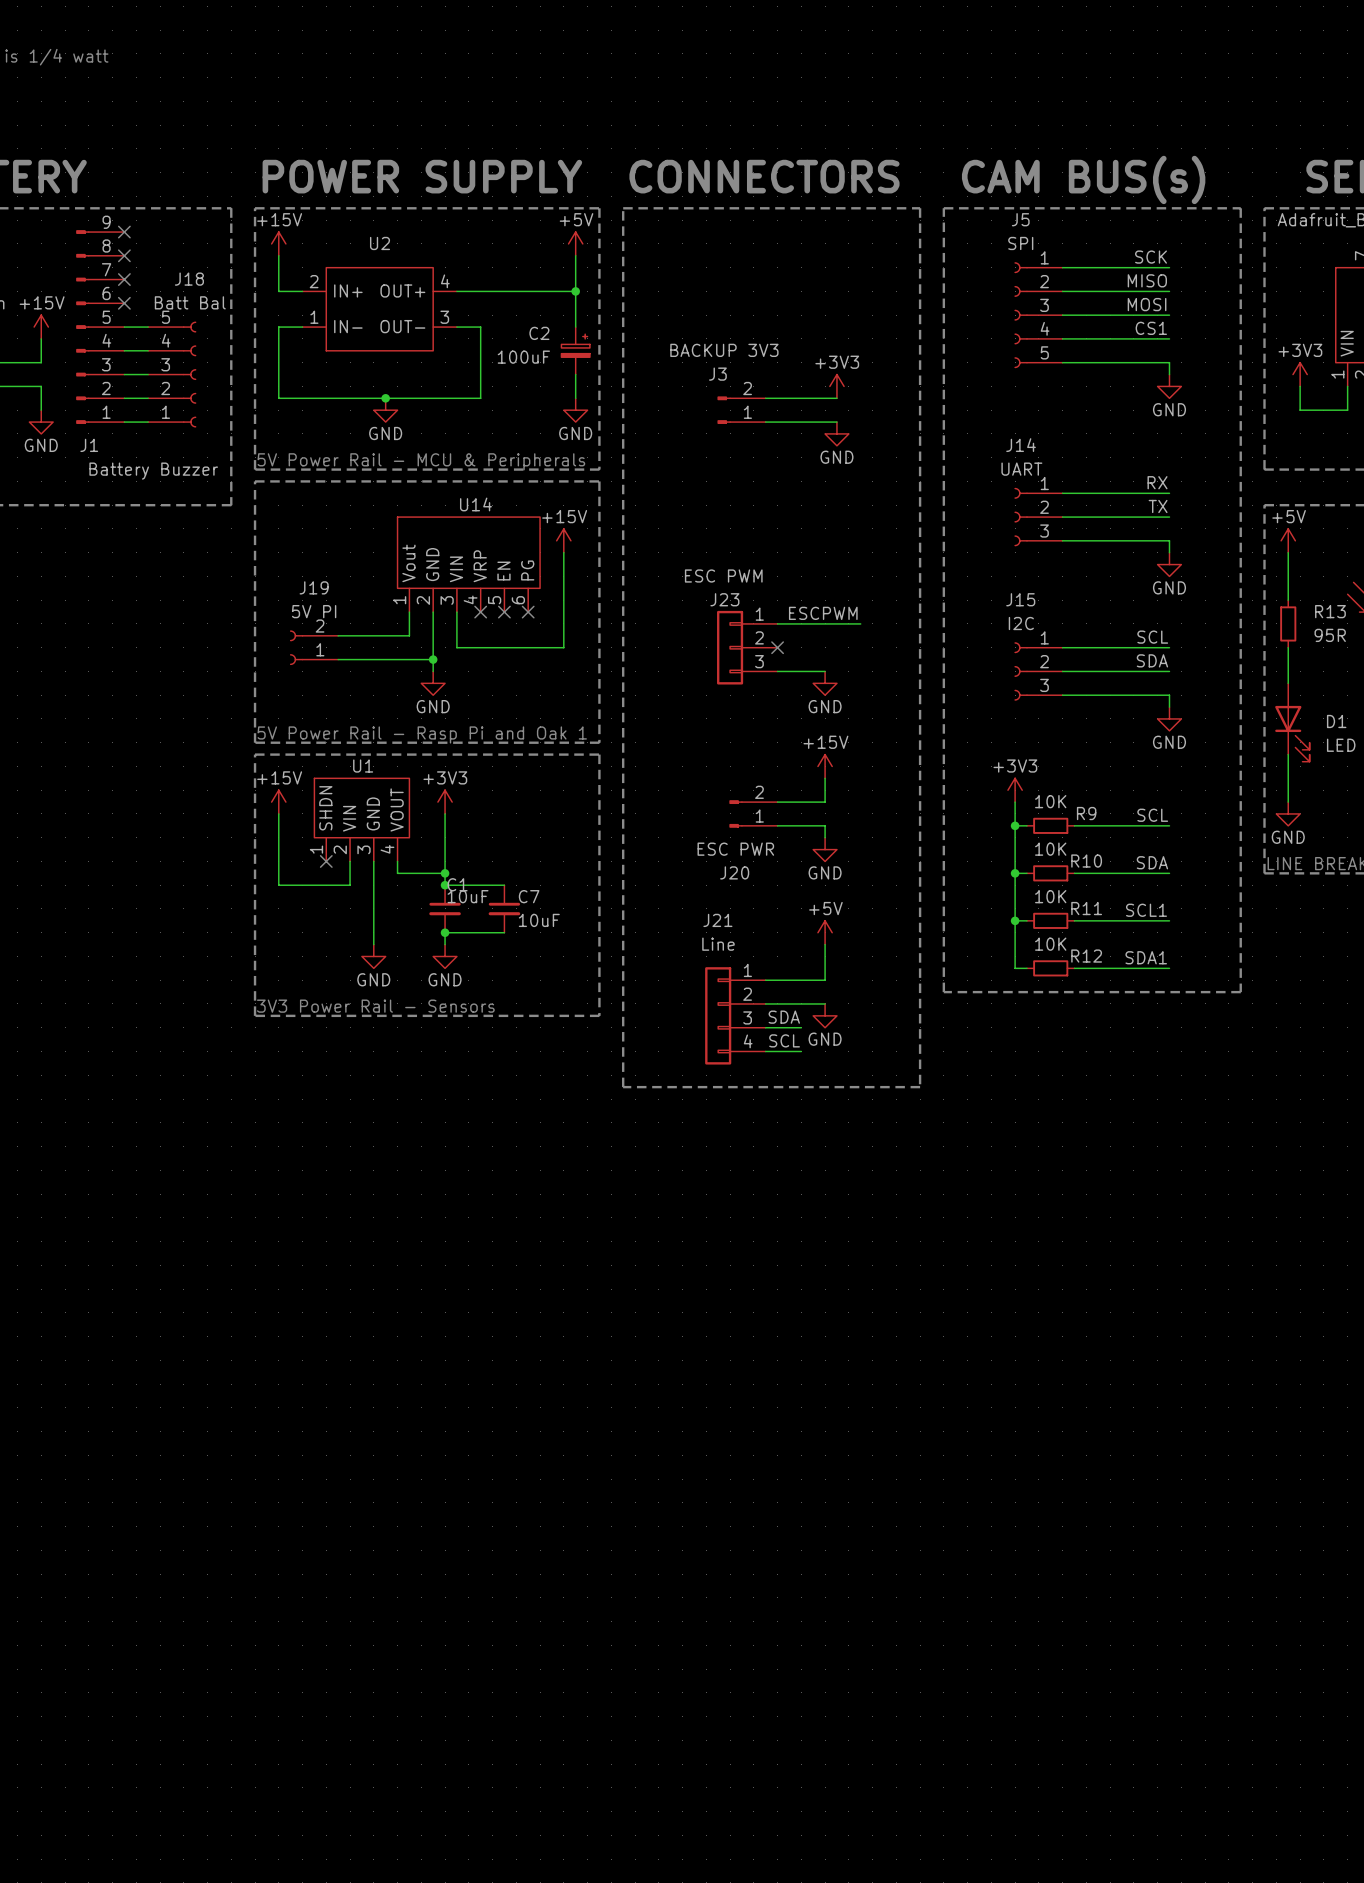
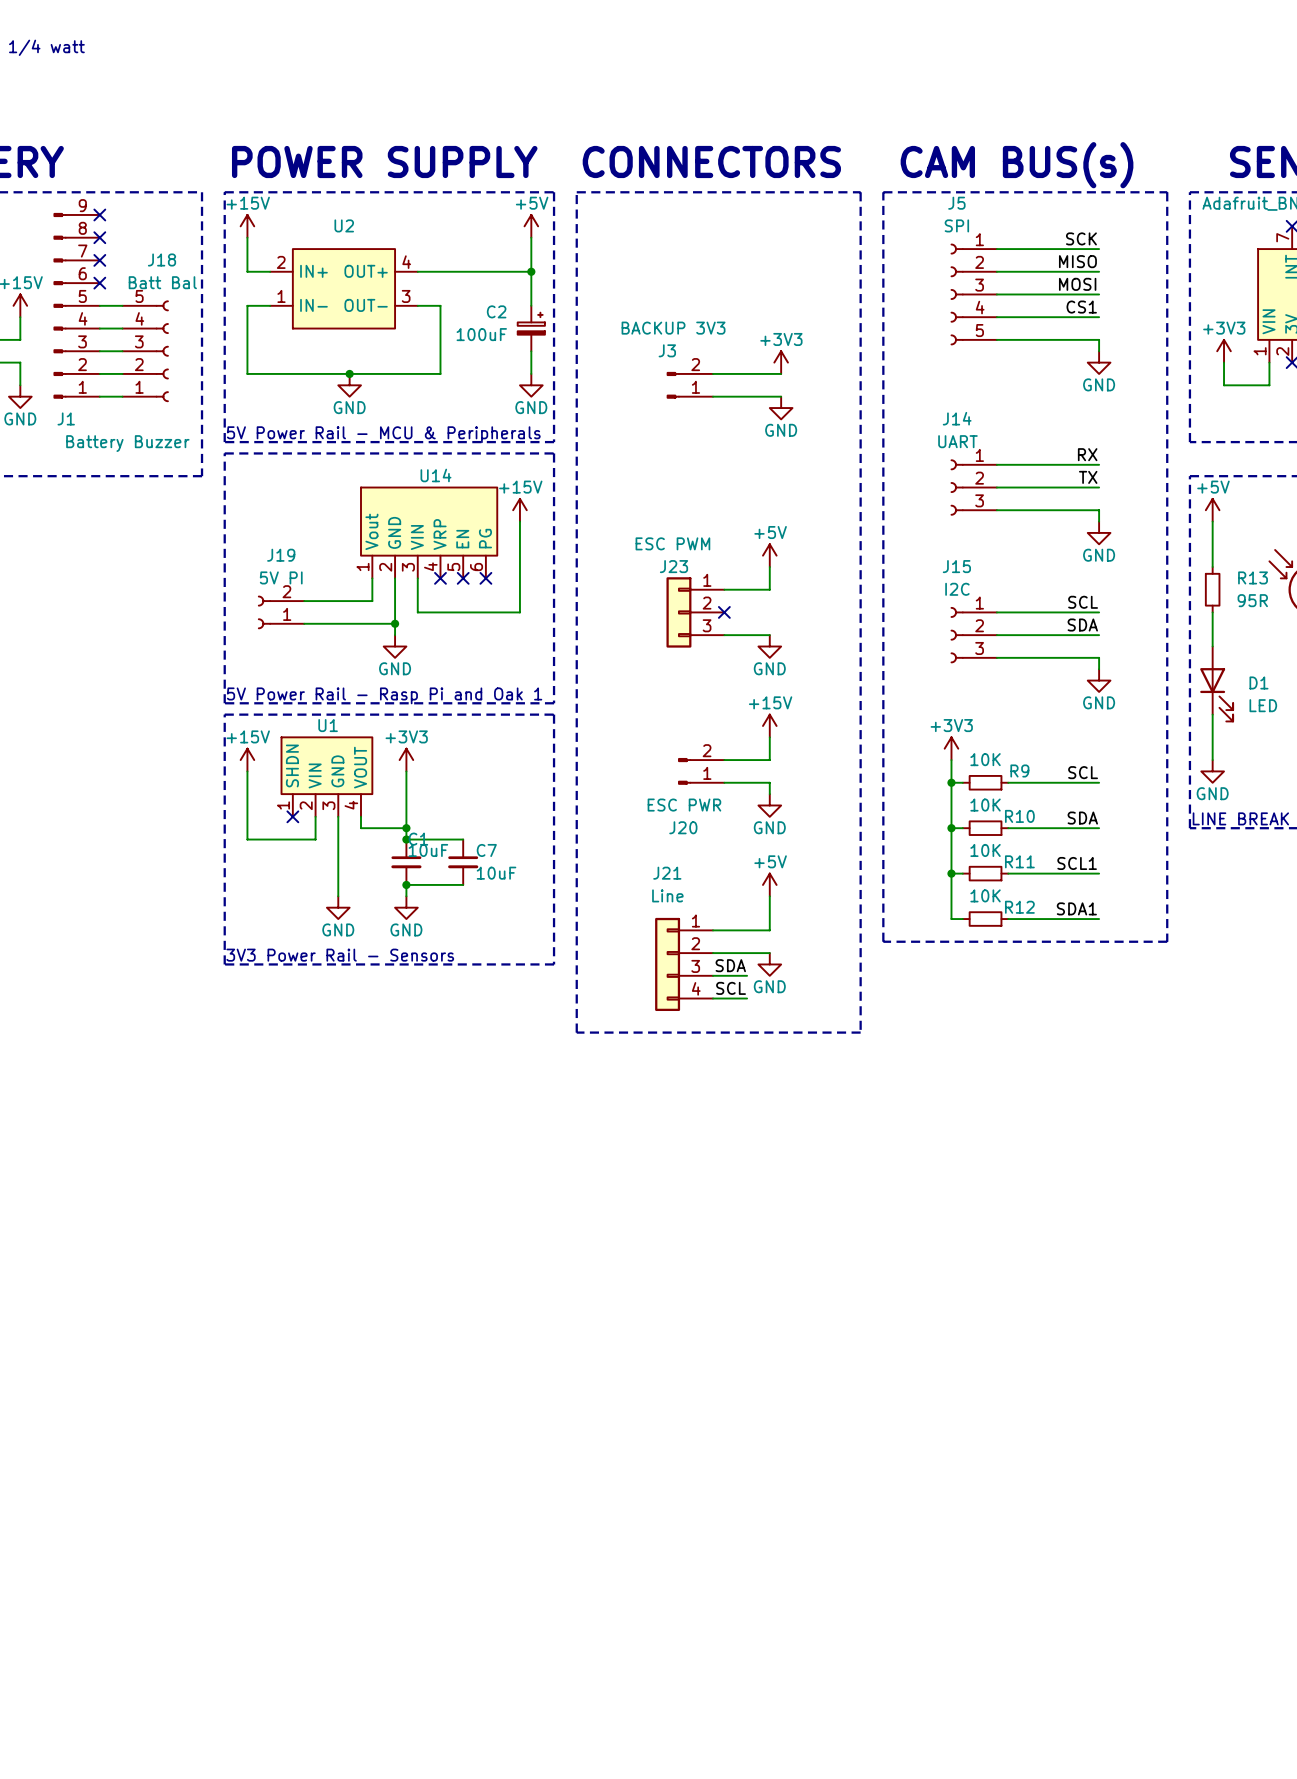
power symbol: none -> +5V (769, 555)
label: ESCPWM (823, 613) -> none
wire: (825, 623) (860, 623) -> (769, 589) (769, 567)

